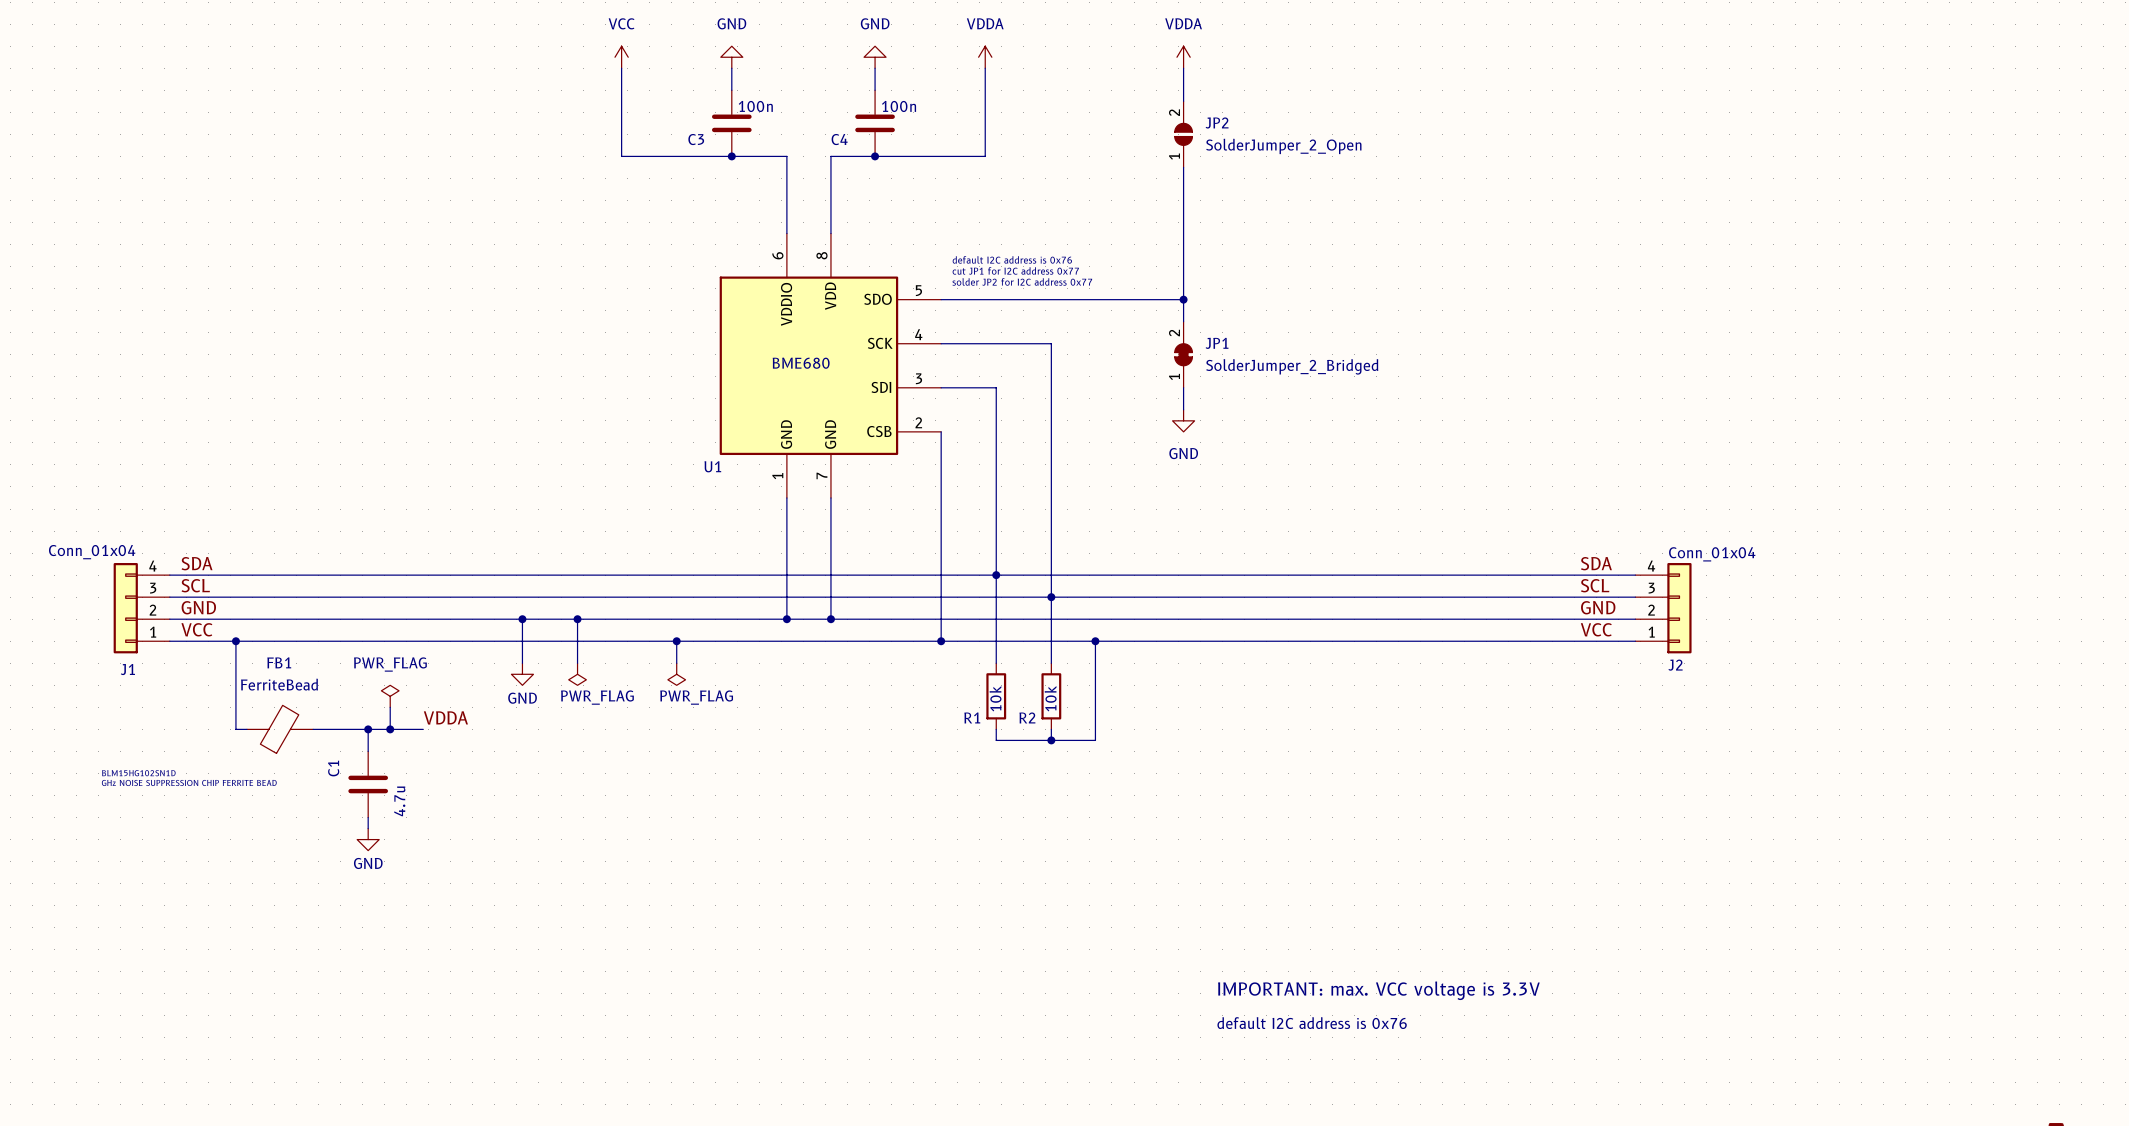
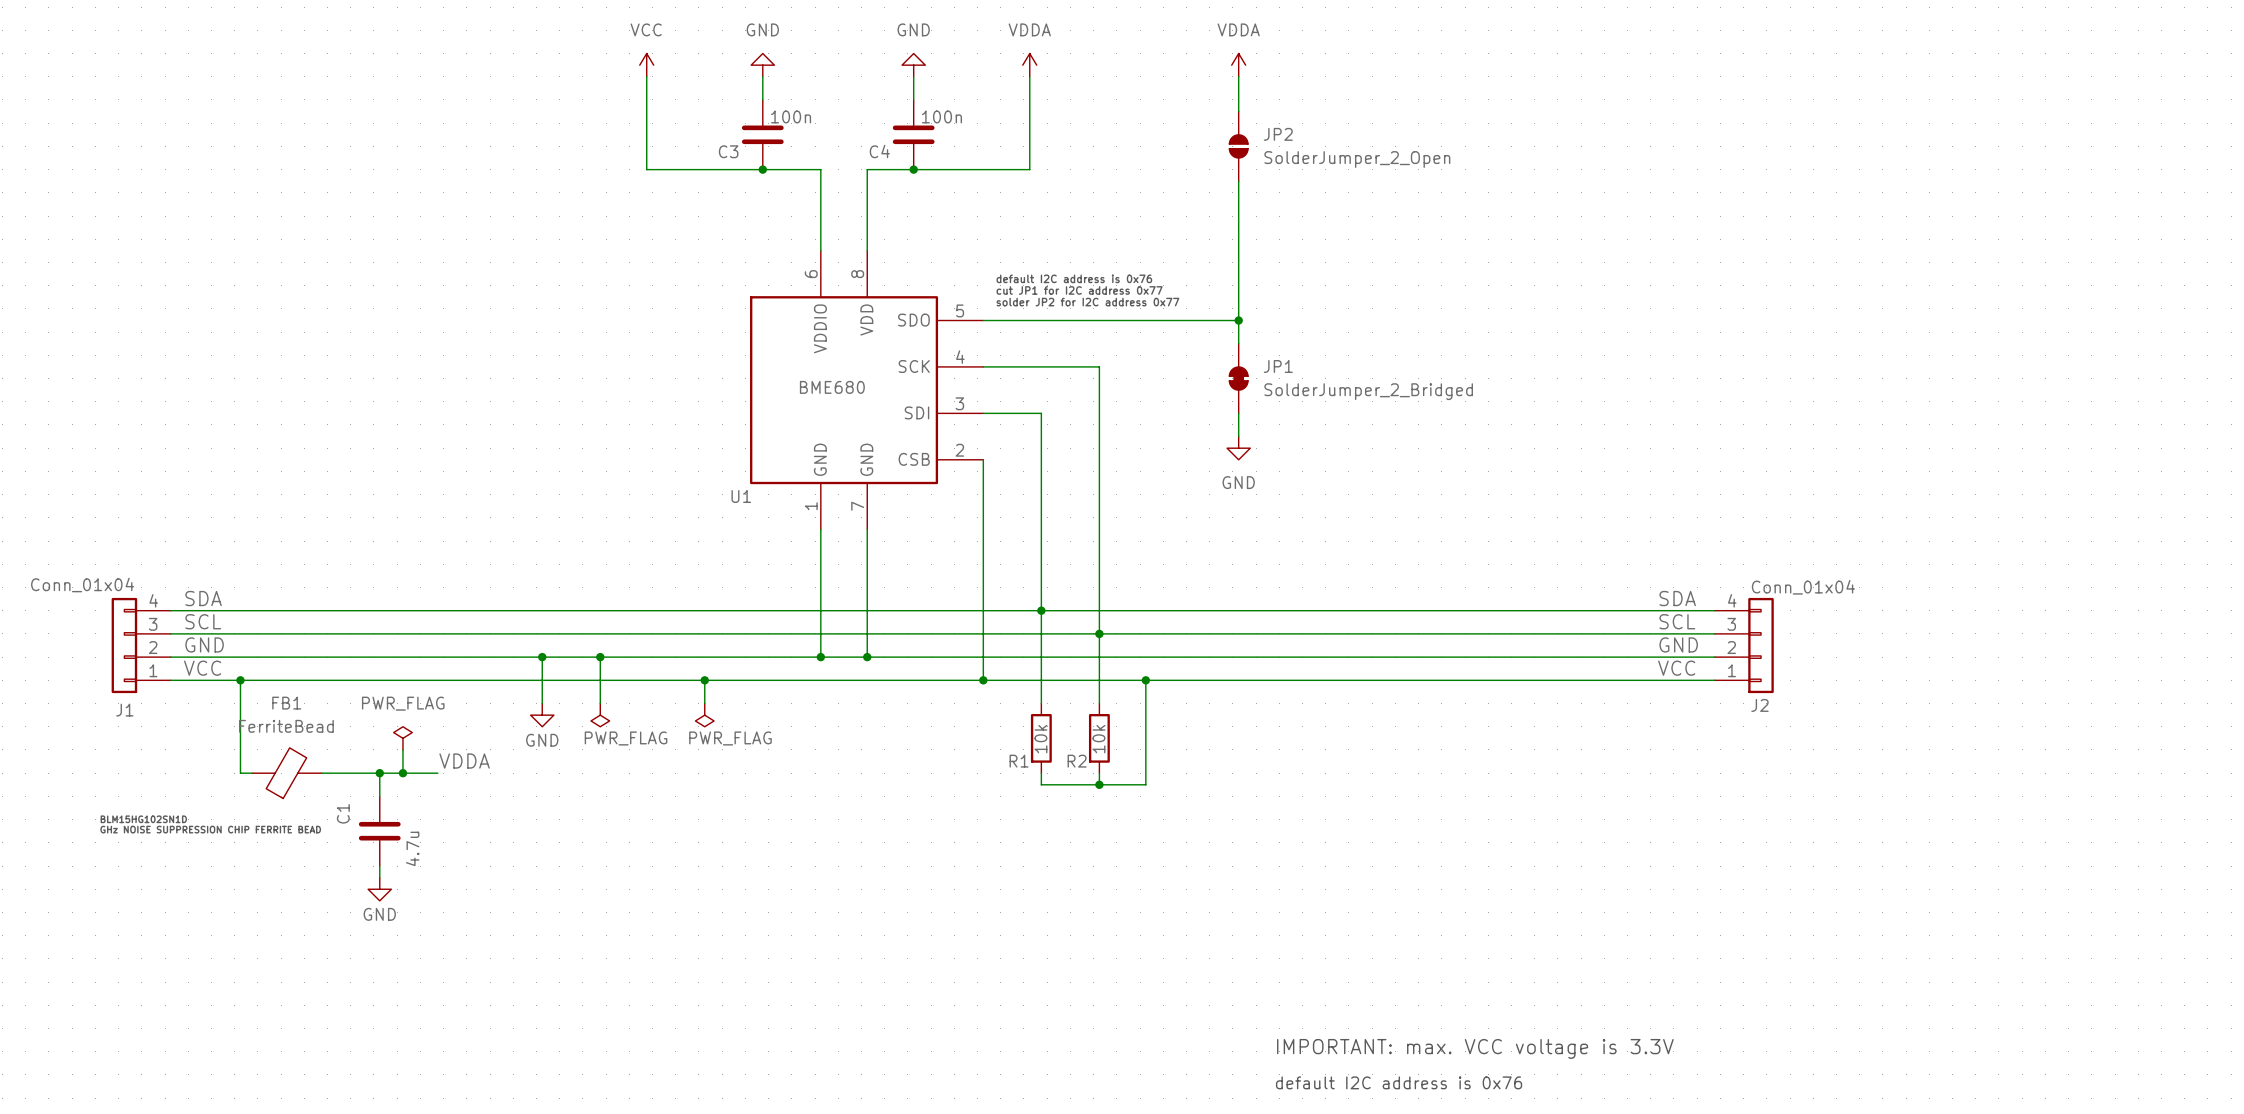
JP2 pin number: 2 (1174, 112) -> none
JP2 pin number: 1 (1174, 156) -> none
JP1 pin number: 2 (1174, 333) -> none
JP1 pin number: 1 (1174, 376) -> none

